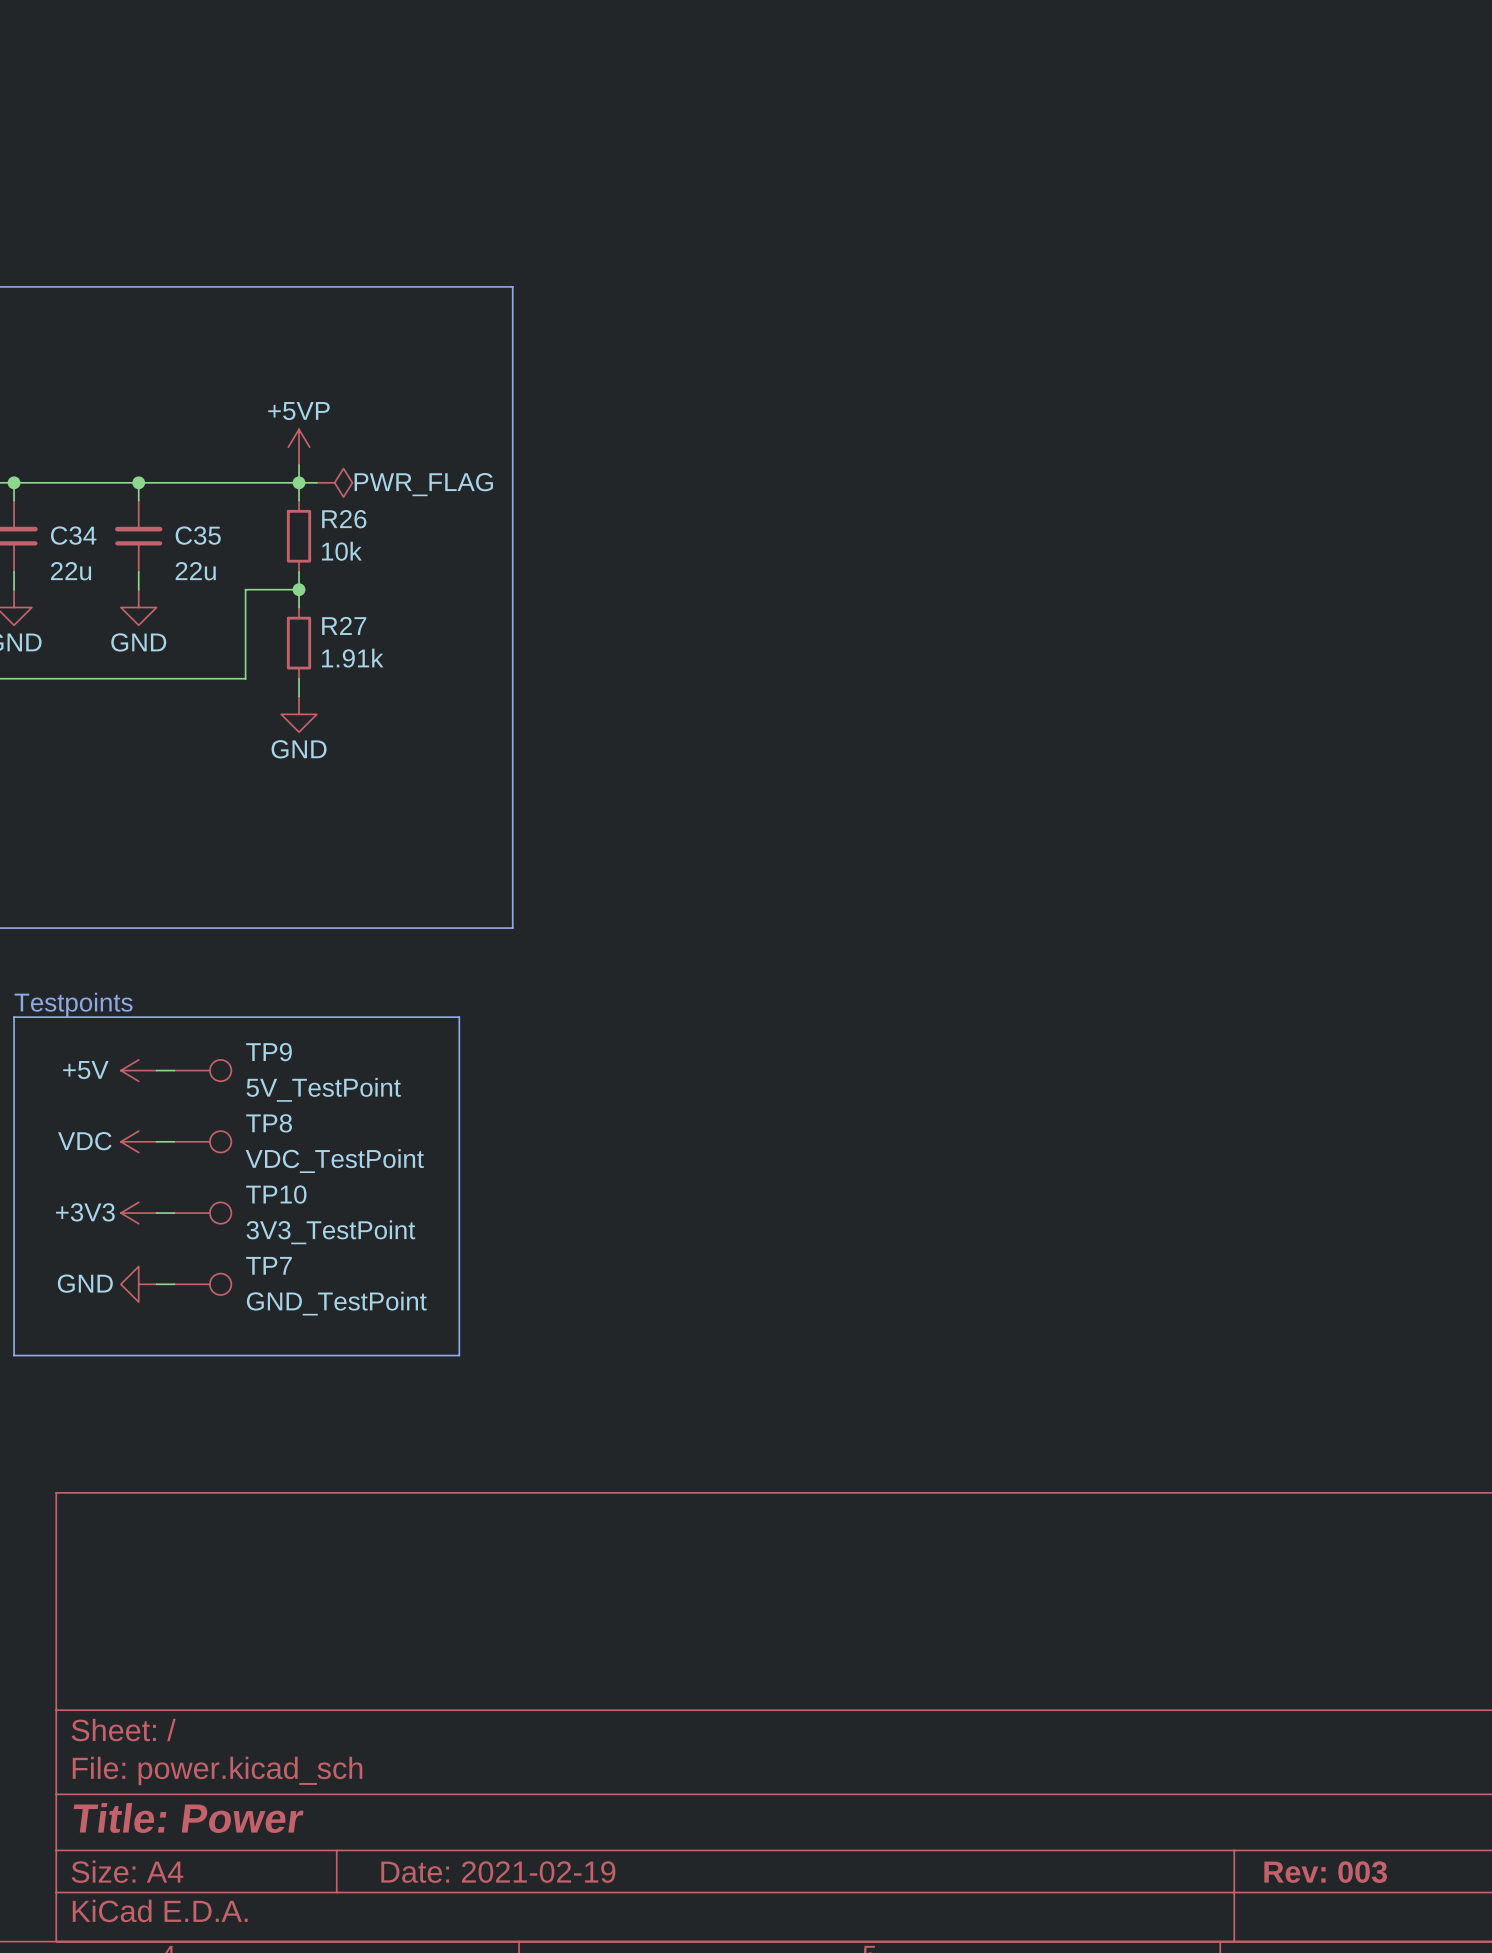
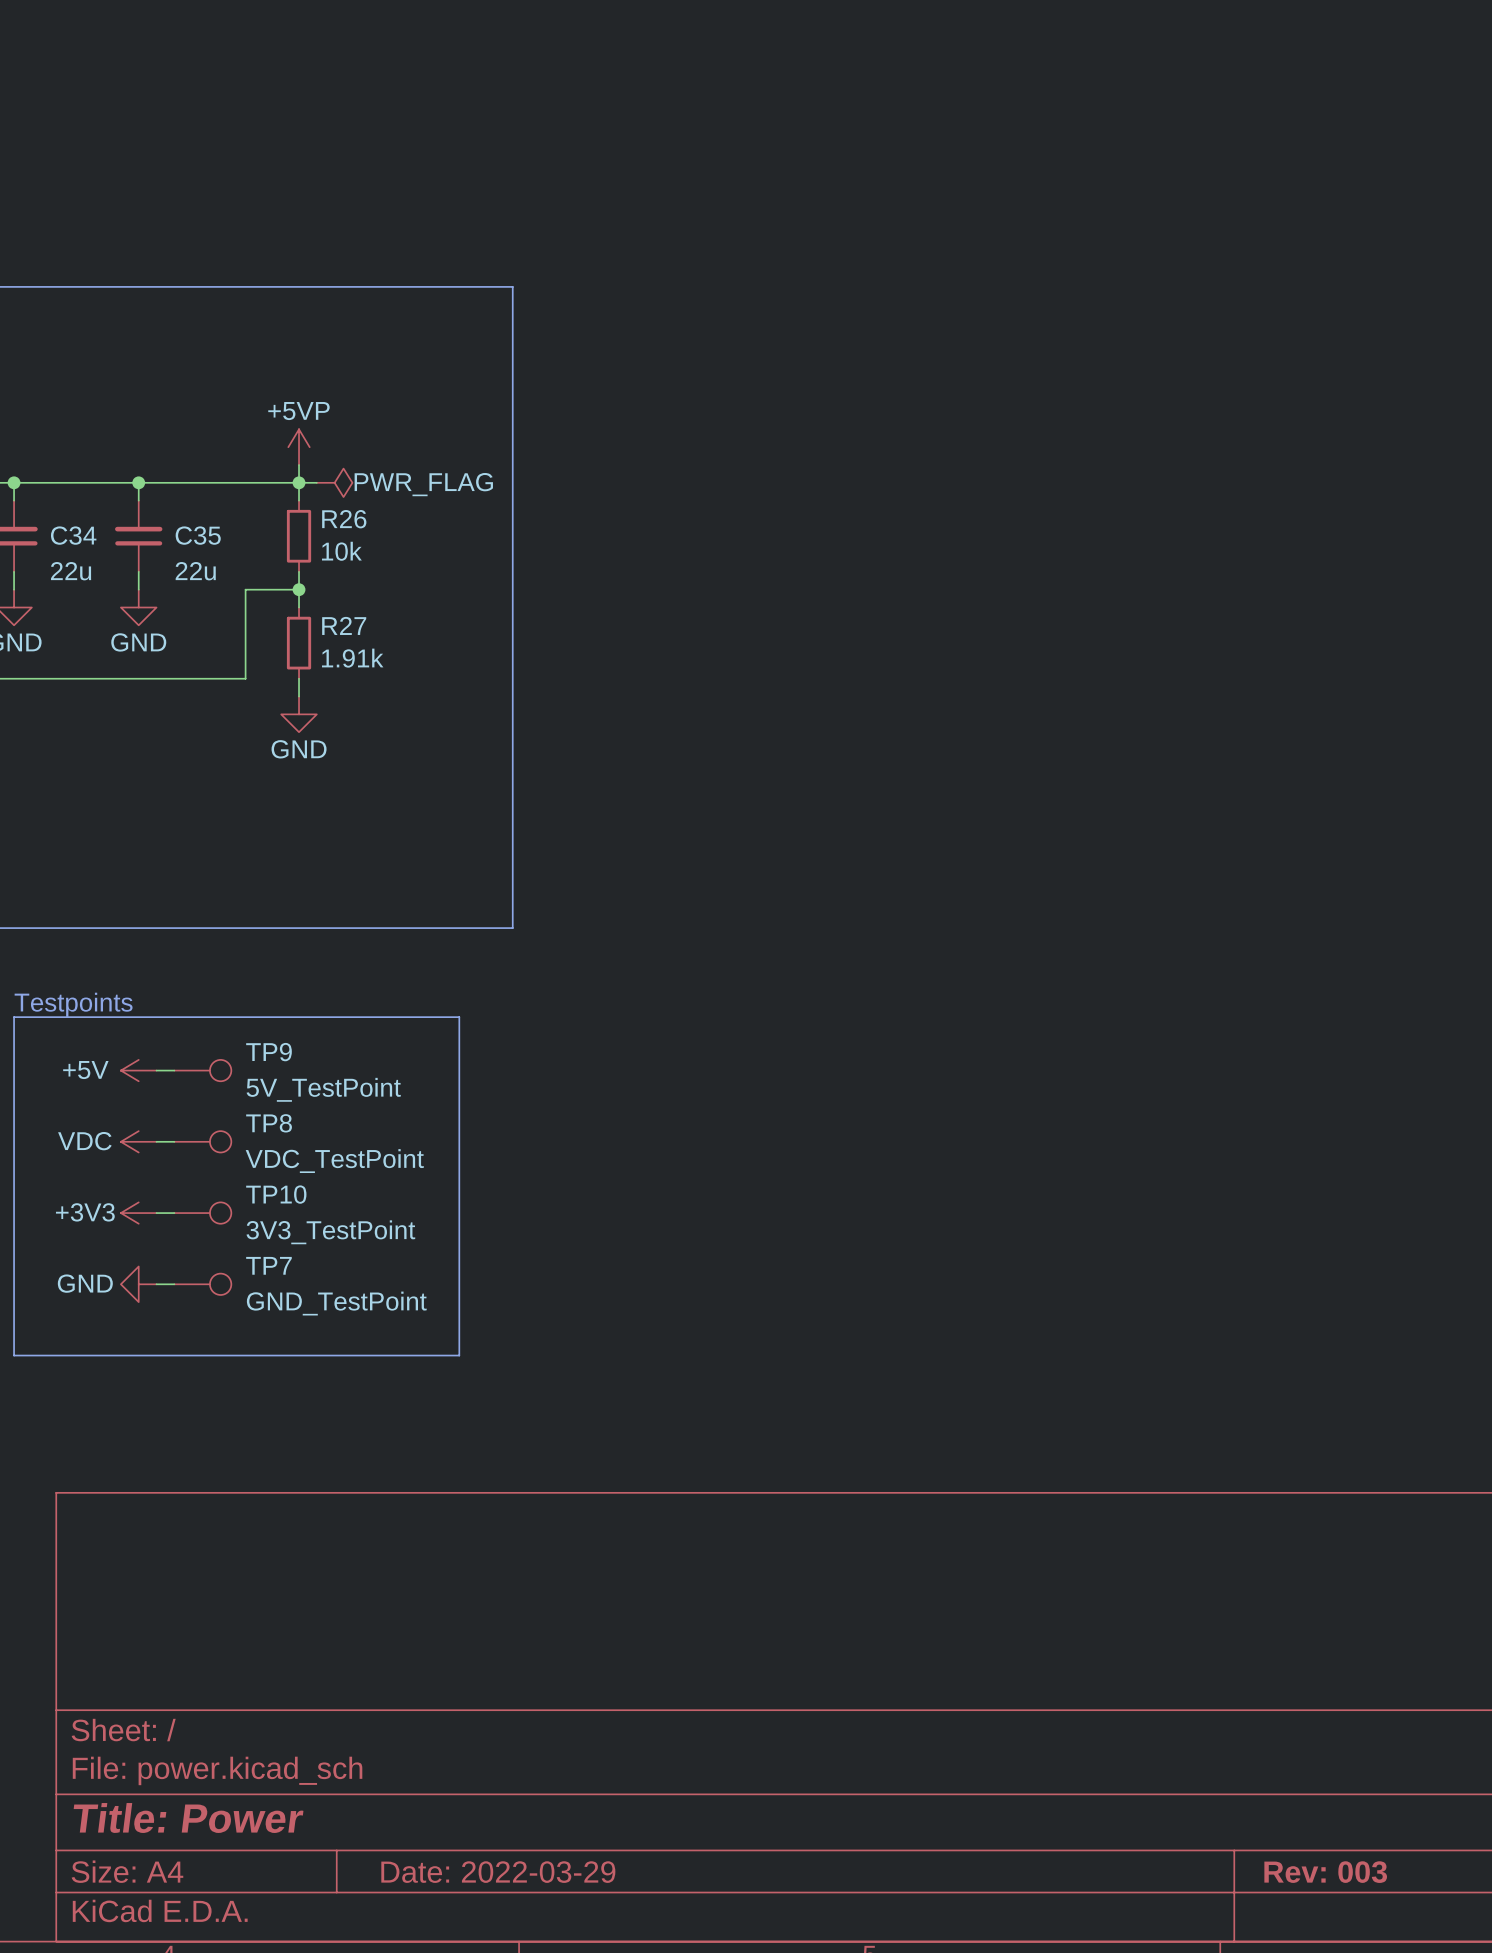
title block: Date: 2021-02-19 (498, 1872) -> Date: 2022-03-29 (498, 1872)

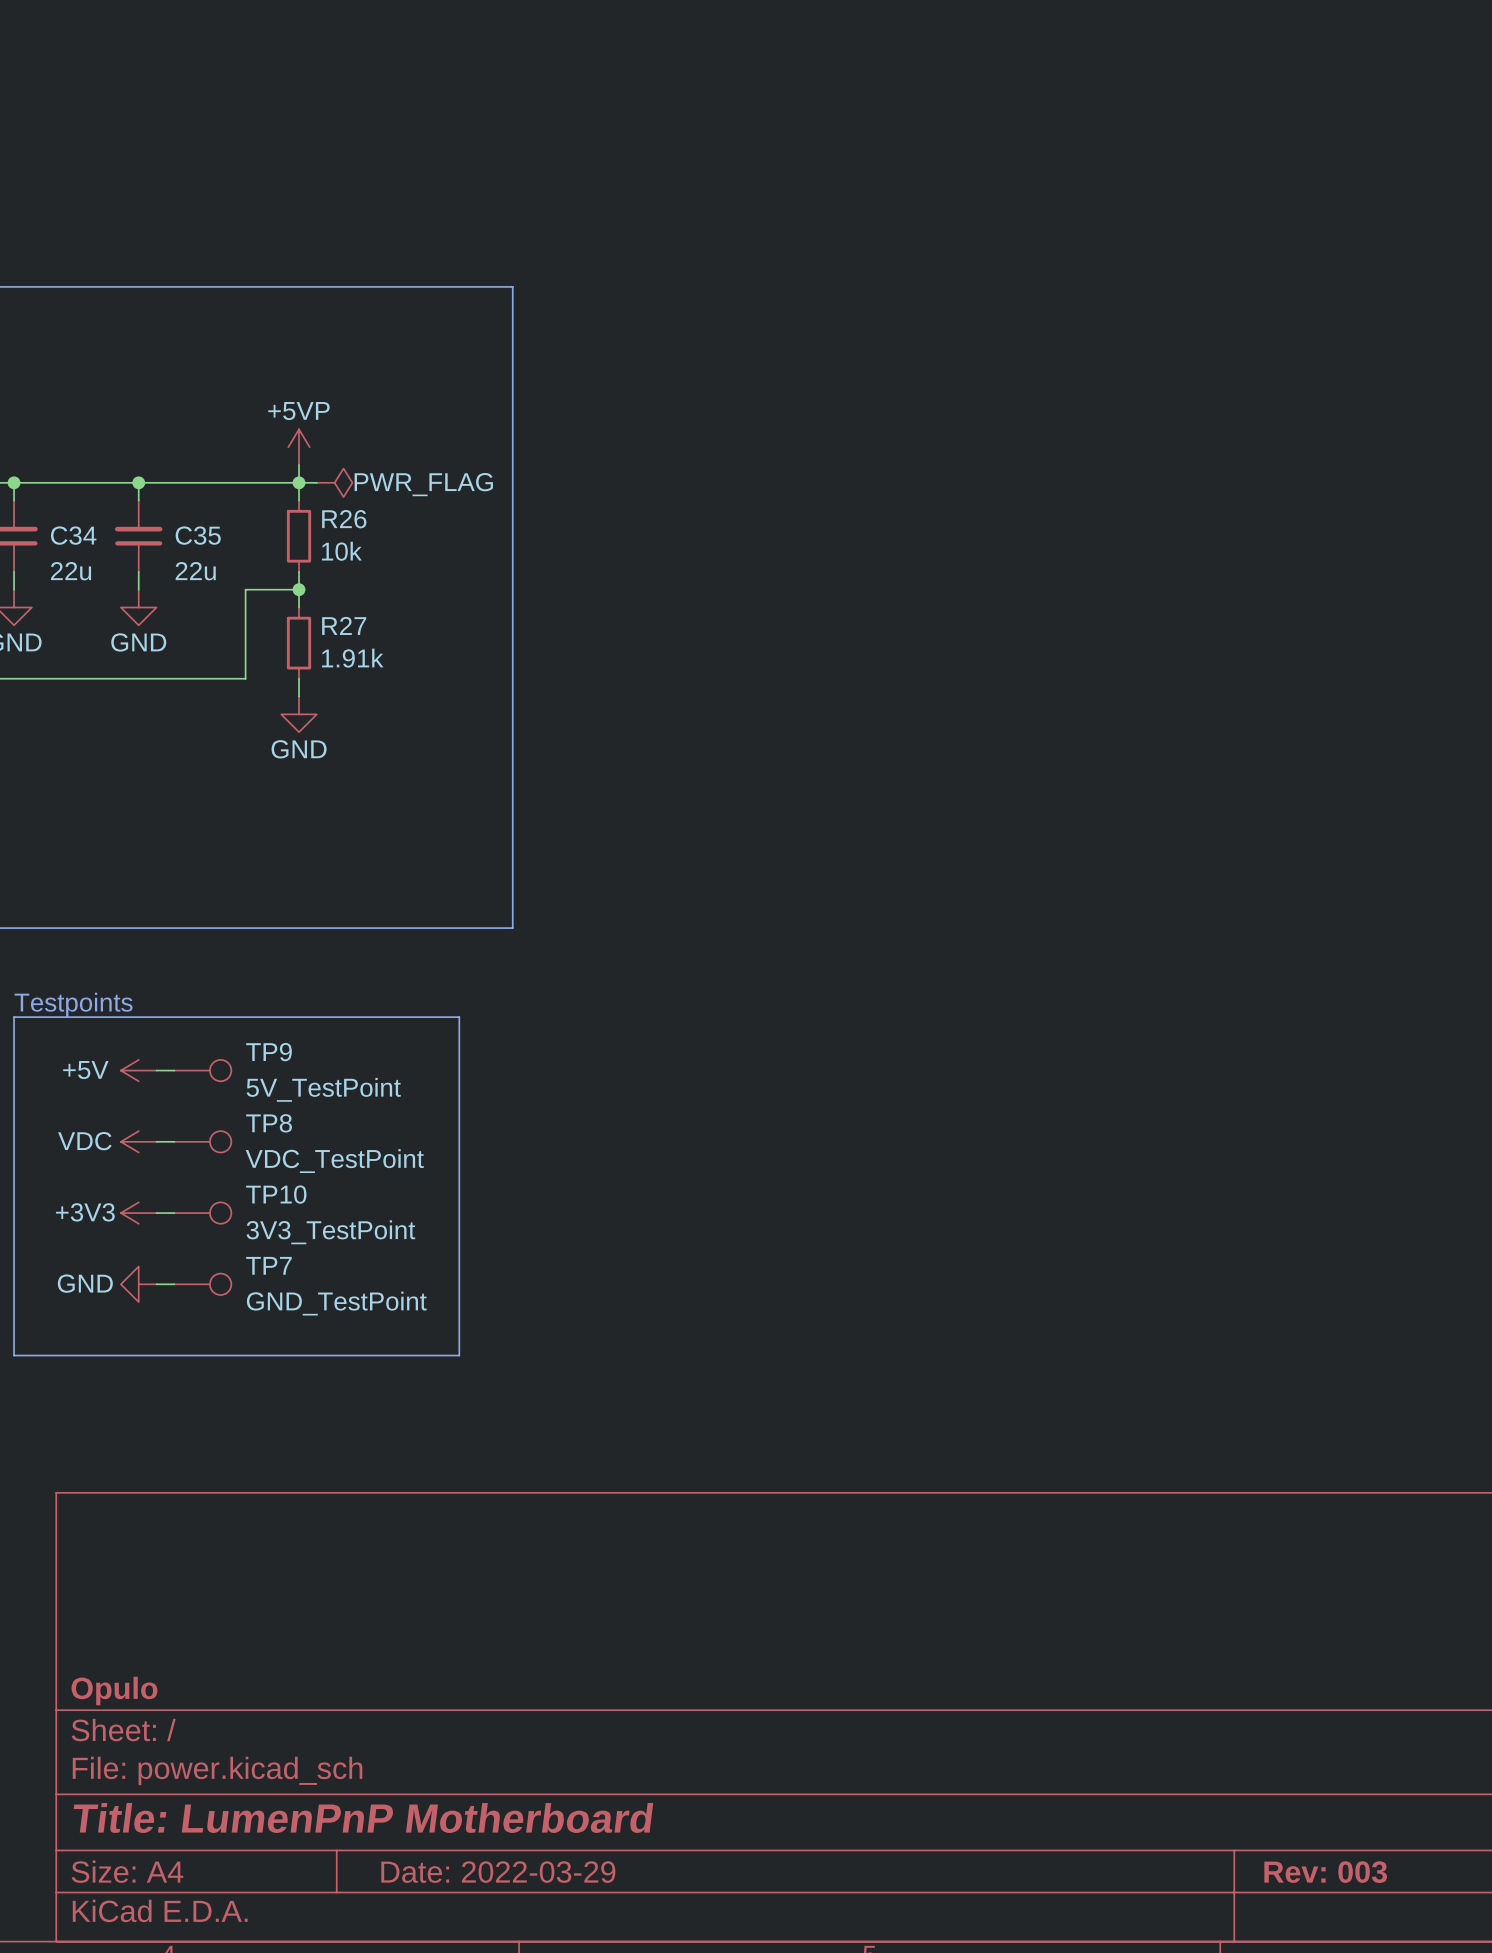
title block: none -> Opulo (114, 1691)
title block: Title: Power (188, 1818) -> Title: LumenPnP Motherboard (363, 1818)

